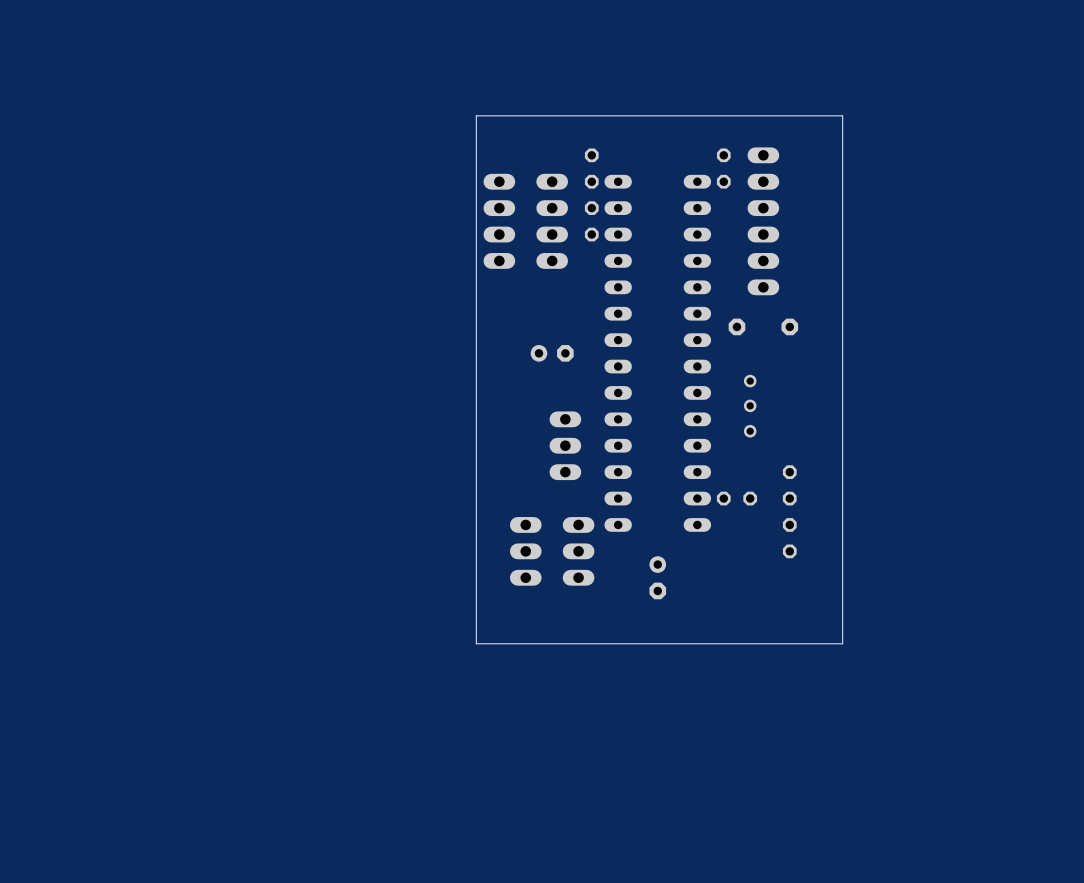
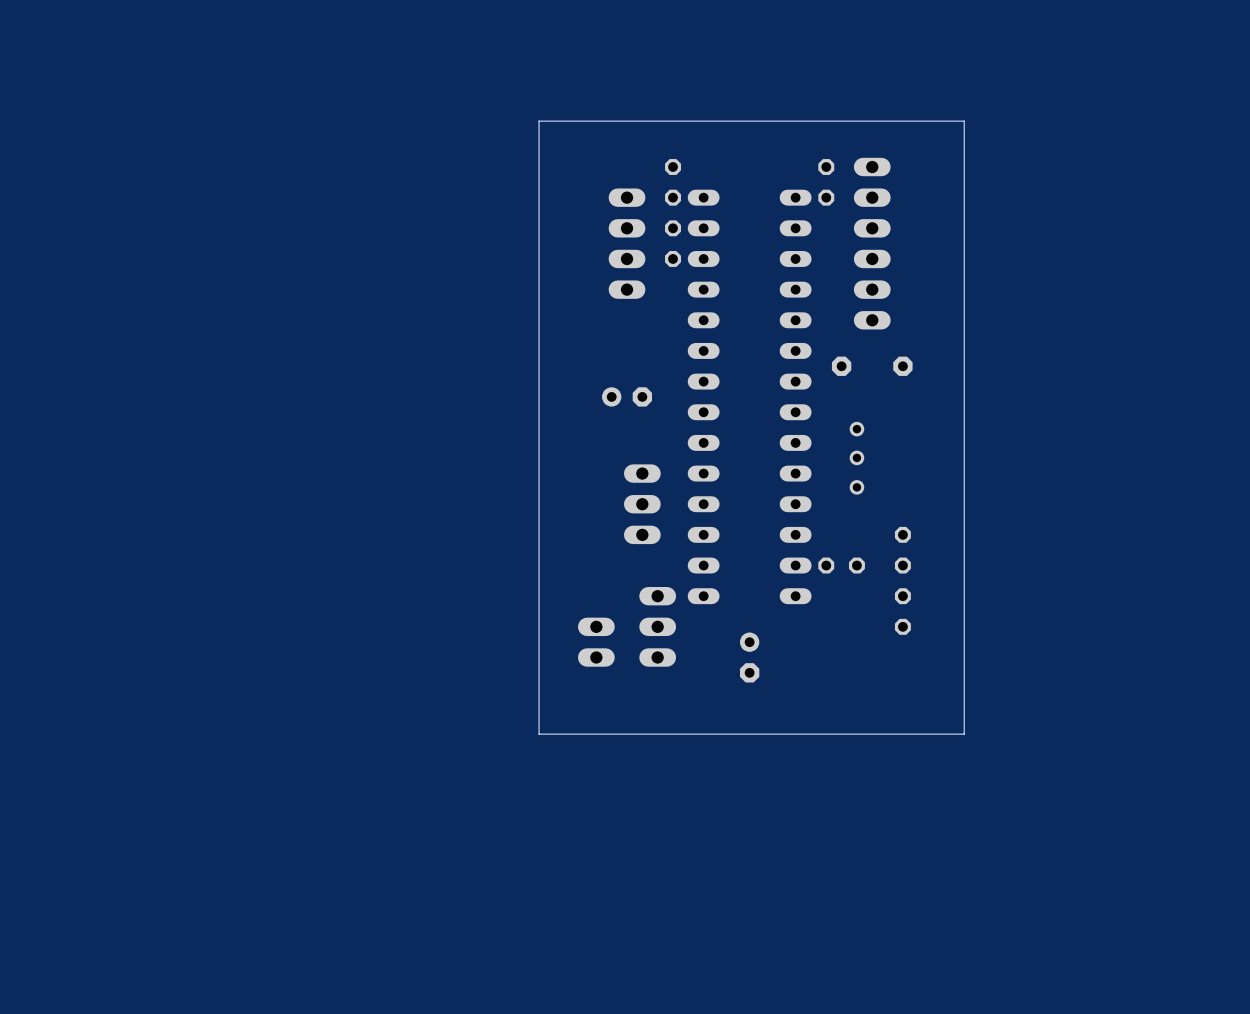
part: (499, 221) -> none
part: (525, 551) -> none

